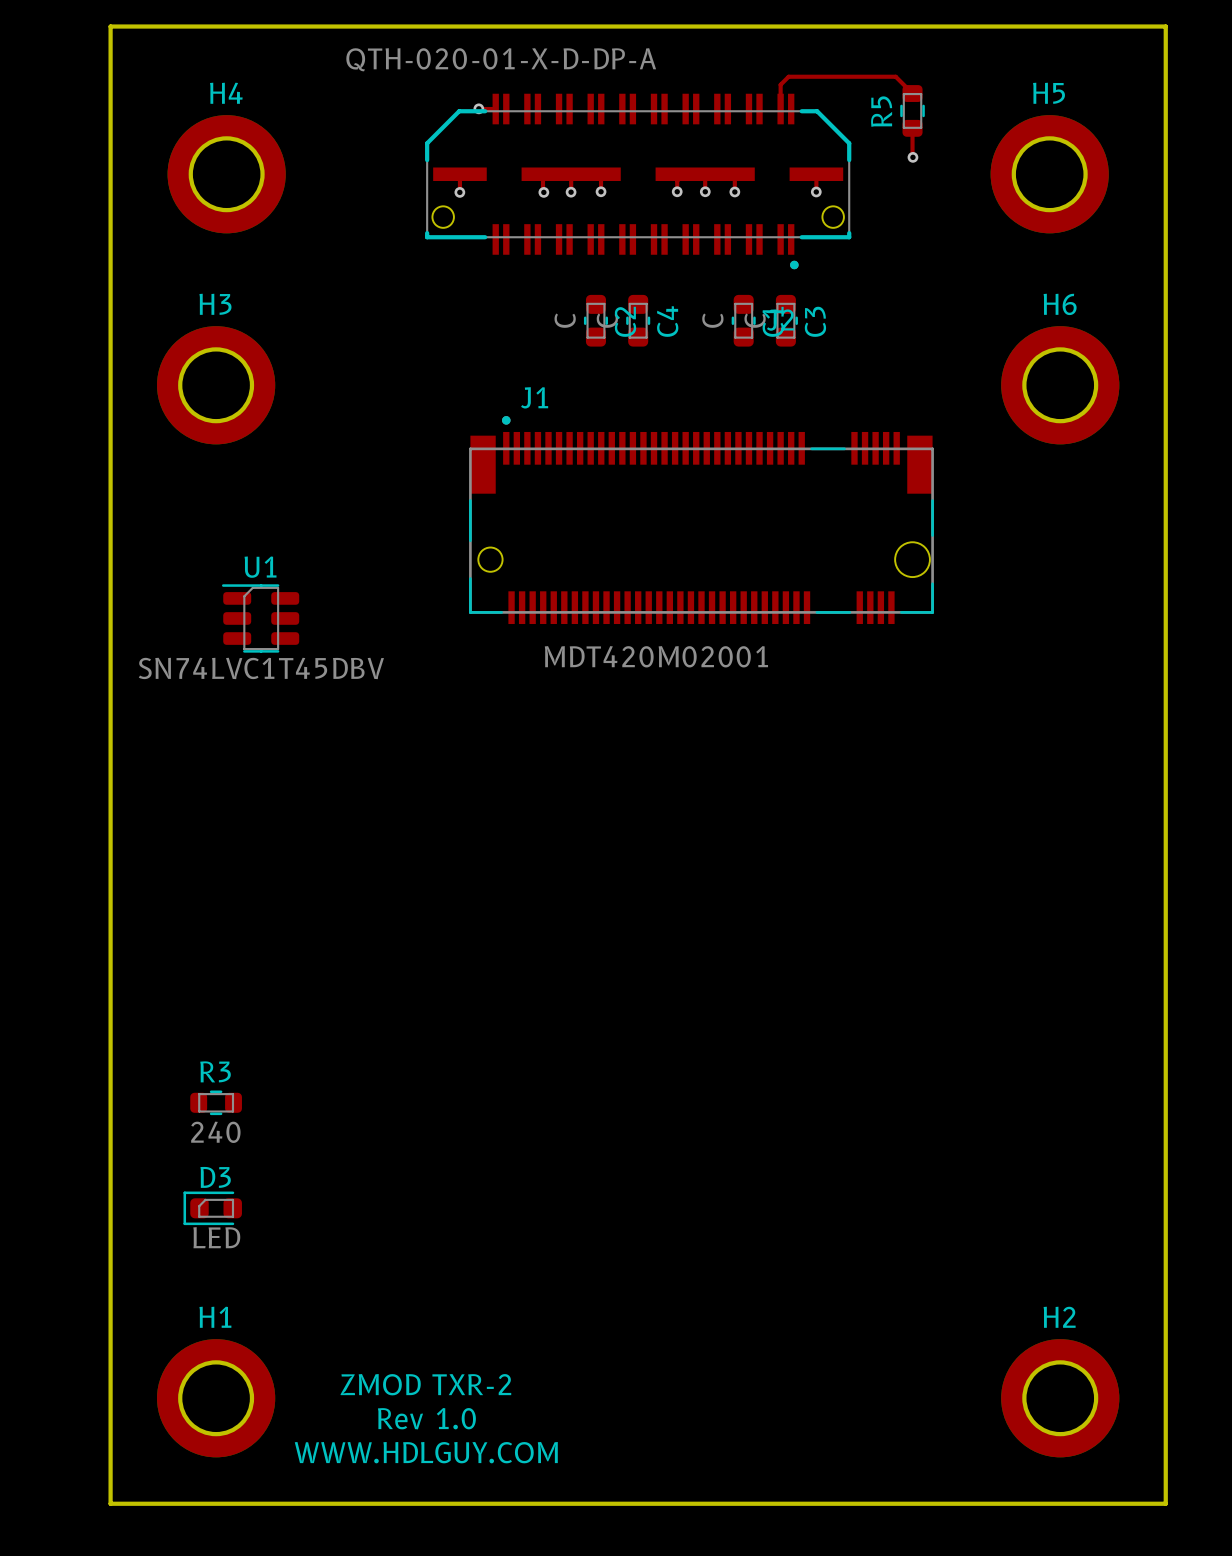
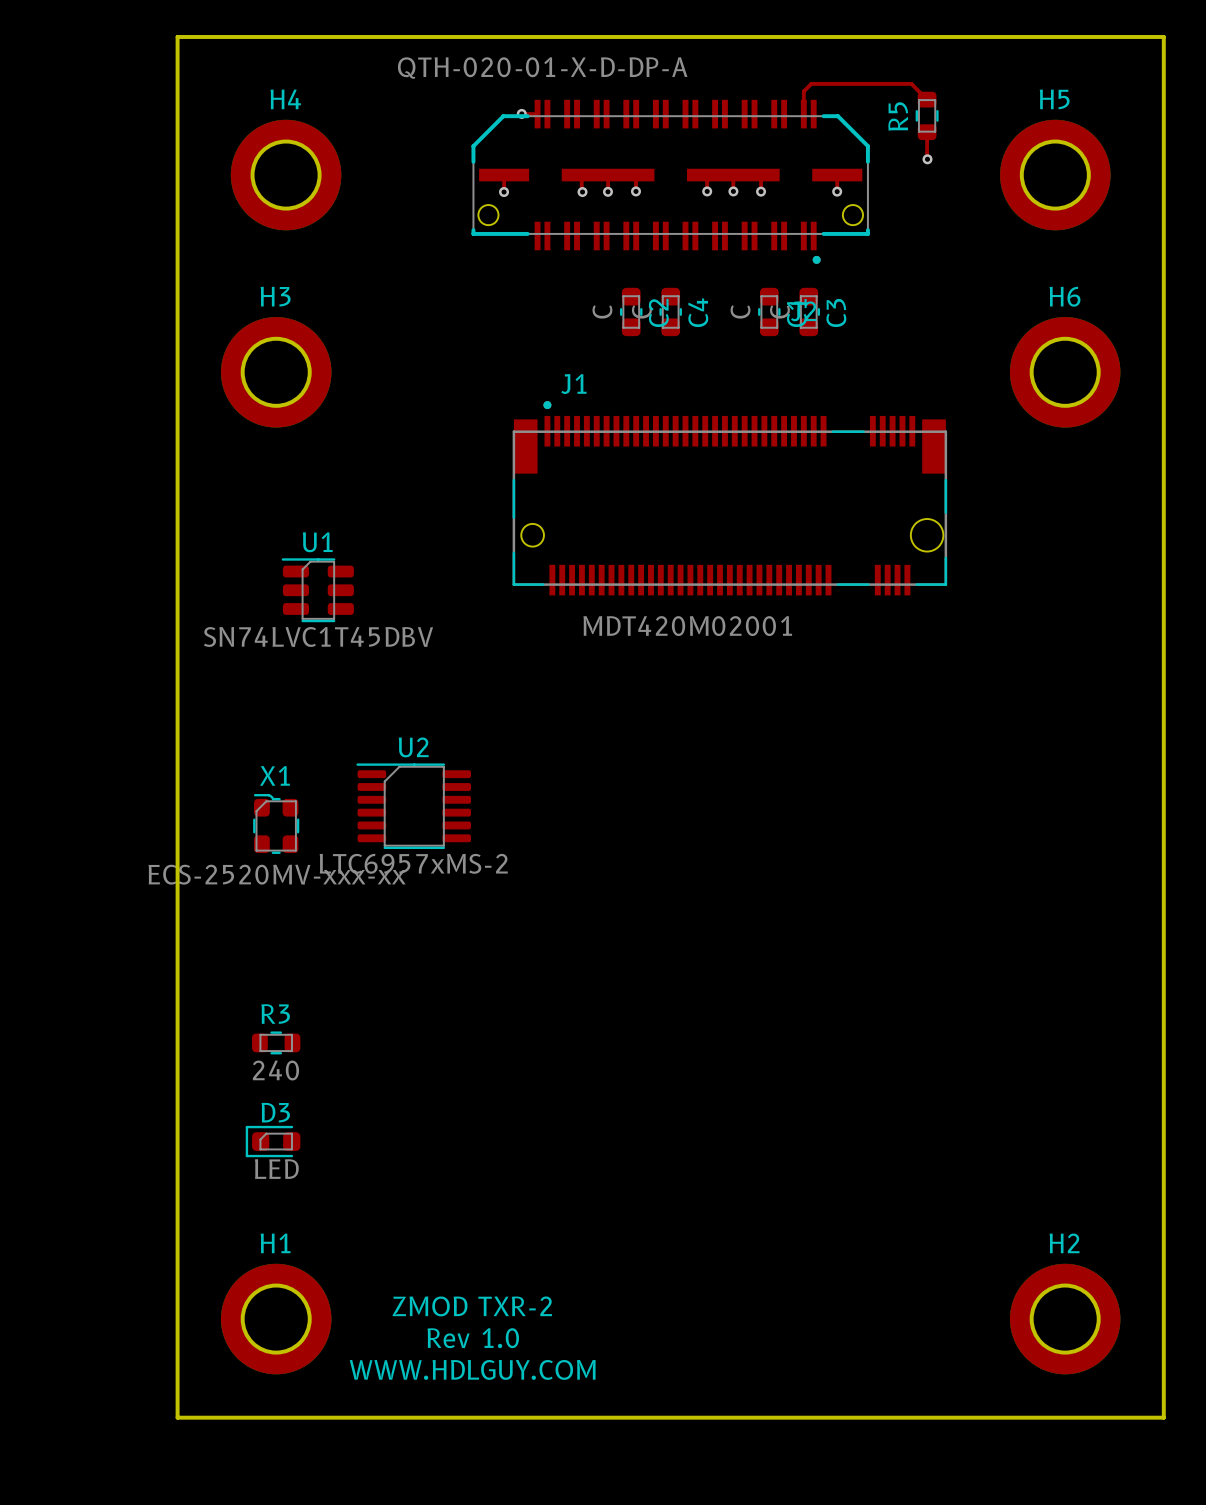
U2: none -> LTC6957xMS-2 (413, 806)
X1: none -> ECS-2520MV-xxx-xx (276, 823)

